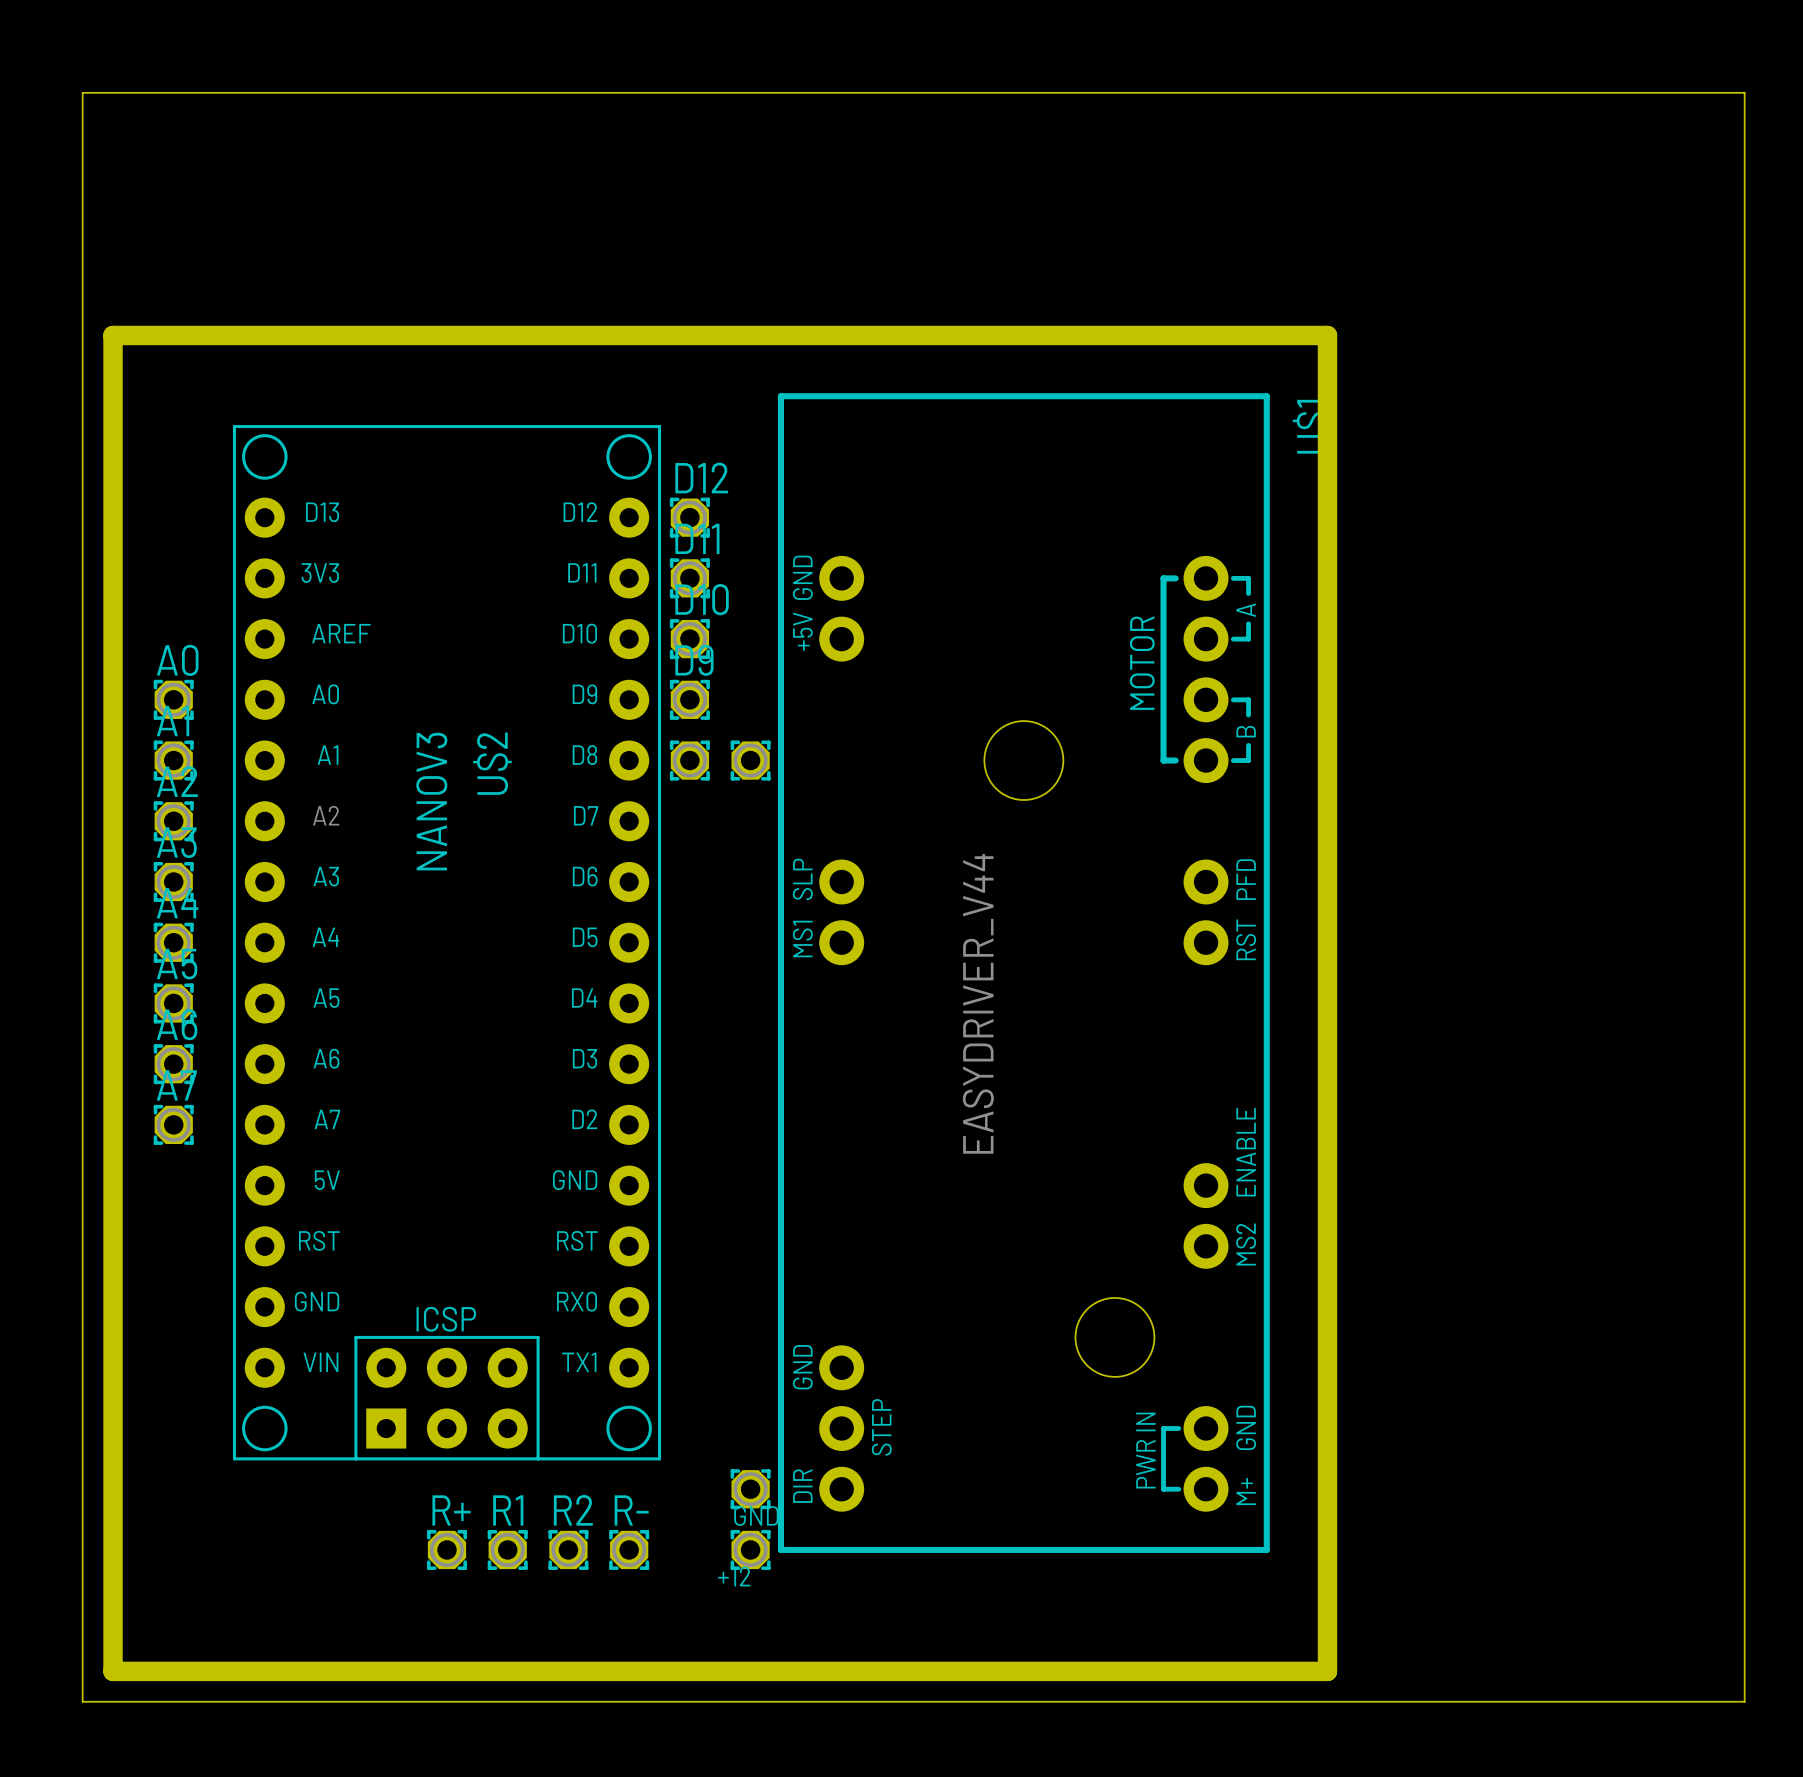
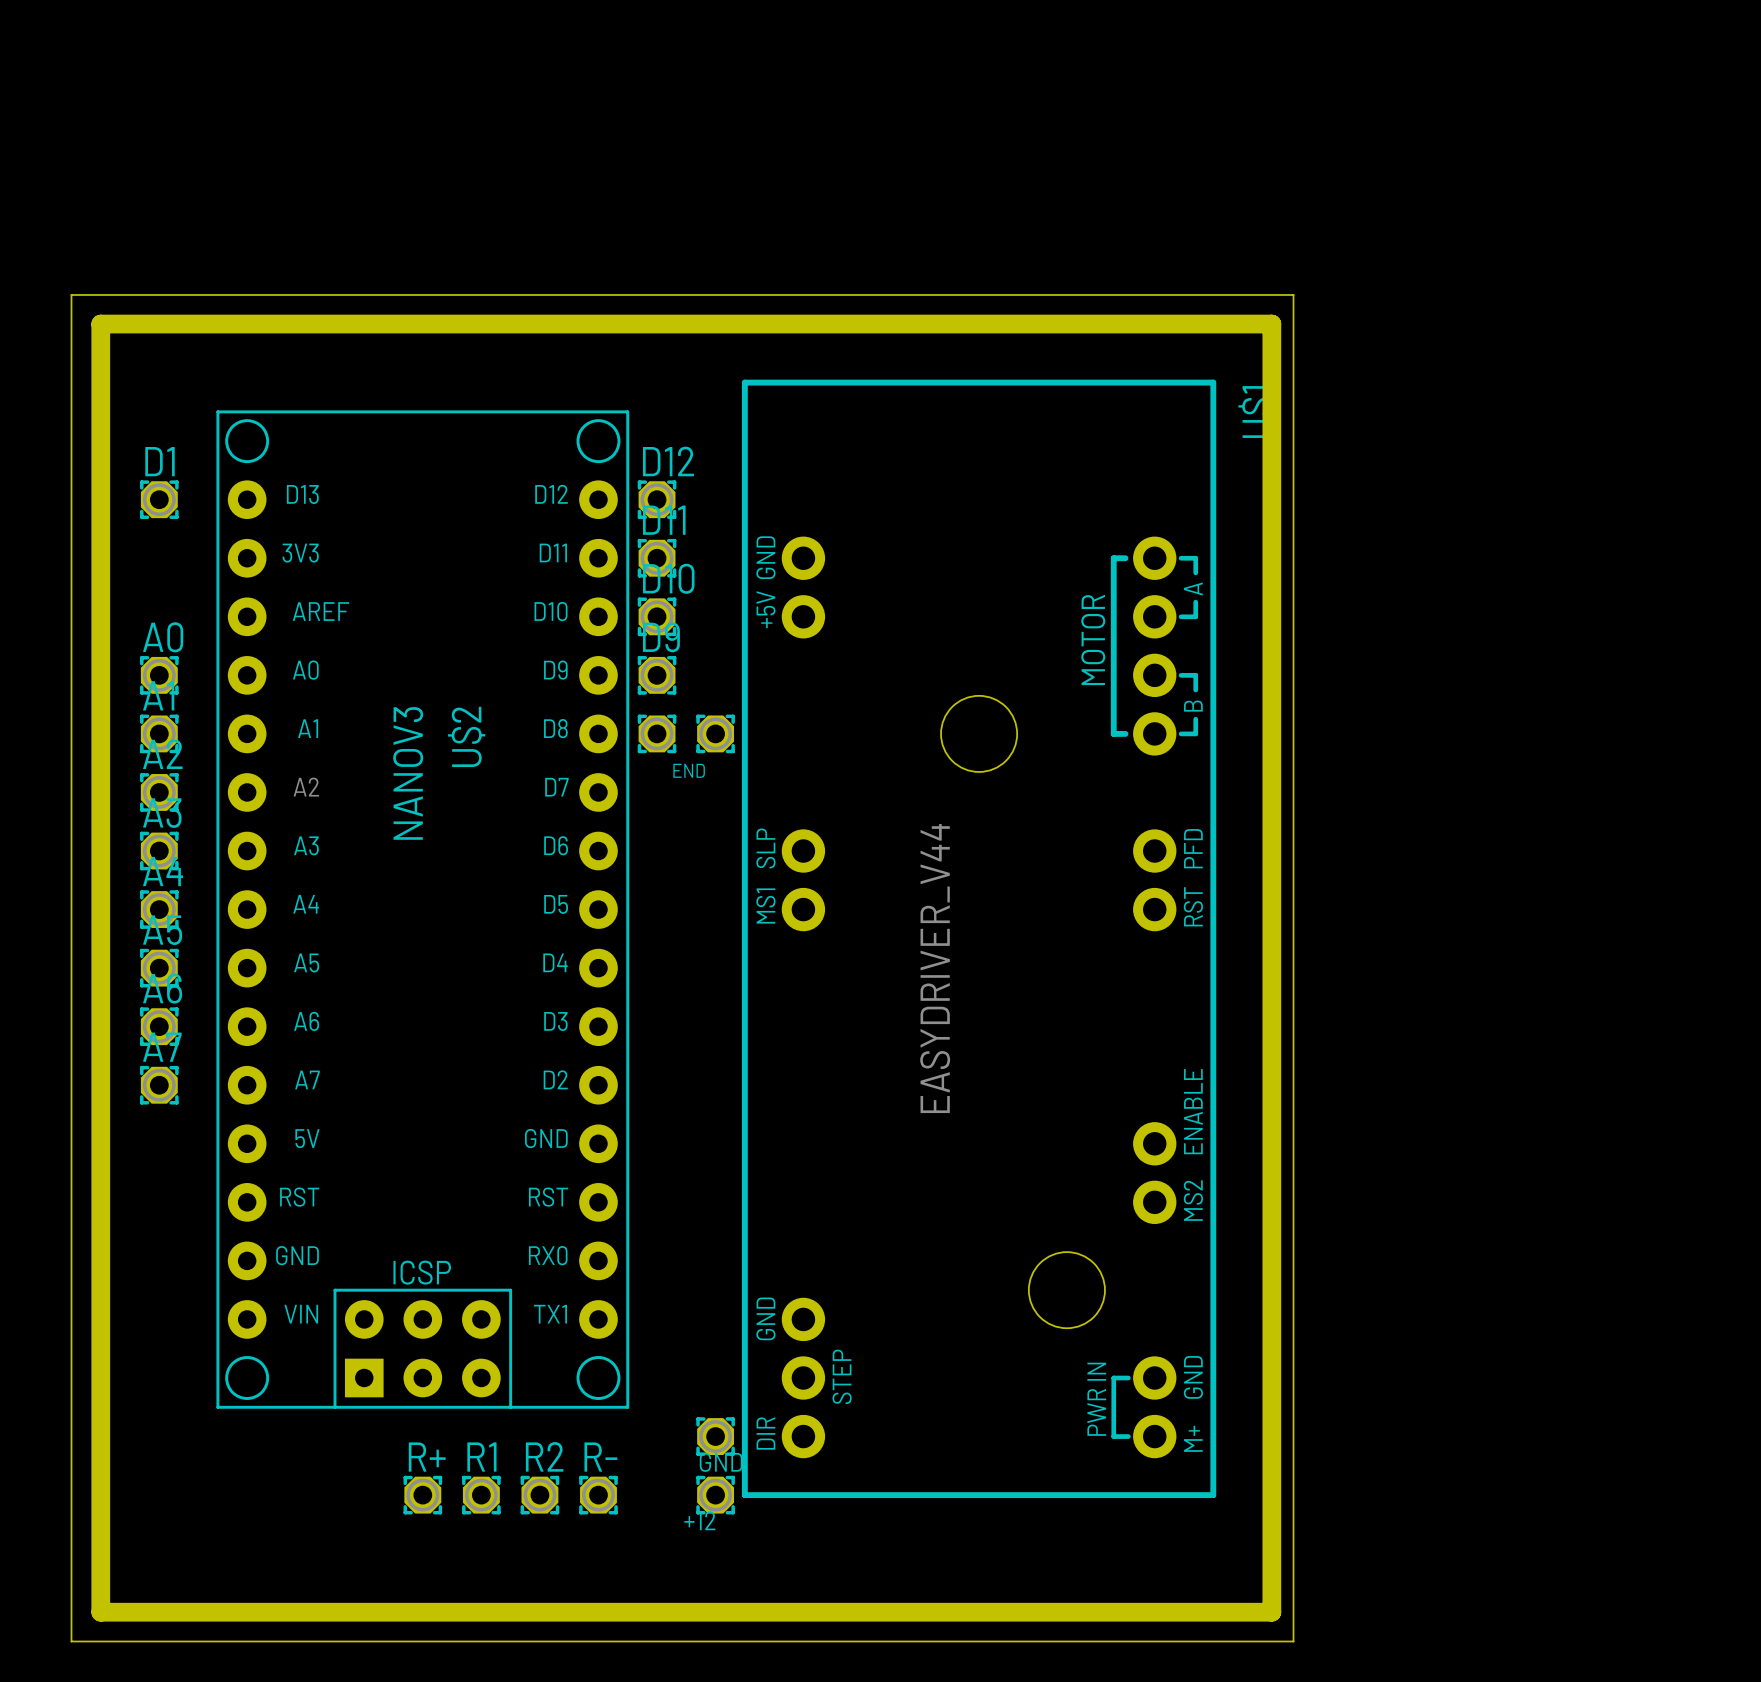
board edge: (82, 305) (82, 92) (1744, 92) (1744, 1701) (1349, 1701) -> (71, 294) (1293, 294) (1293, 1641)
D1: none -> (159, 499)
text: none -> END (689, 770)

